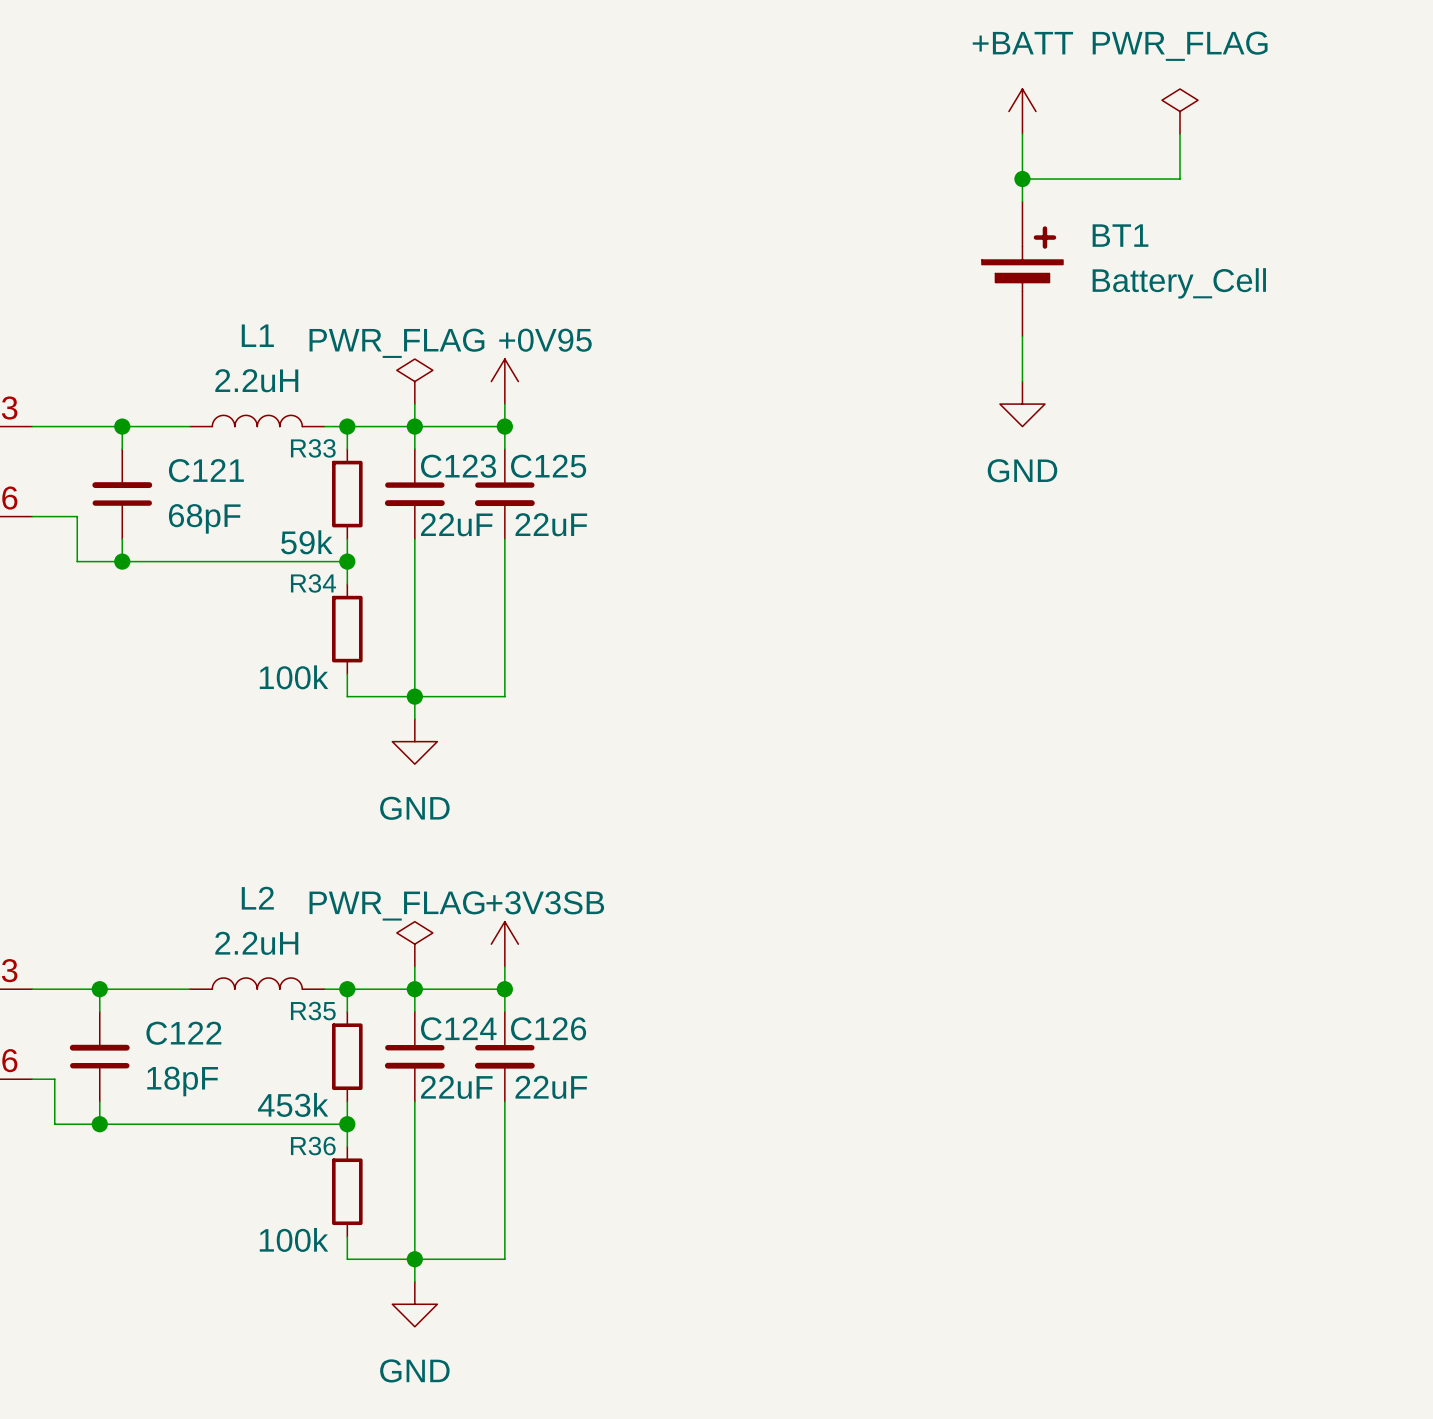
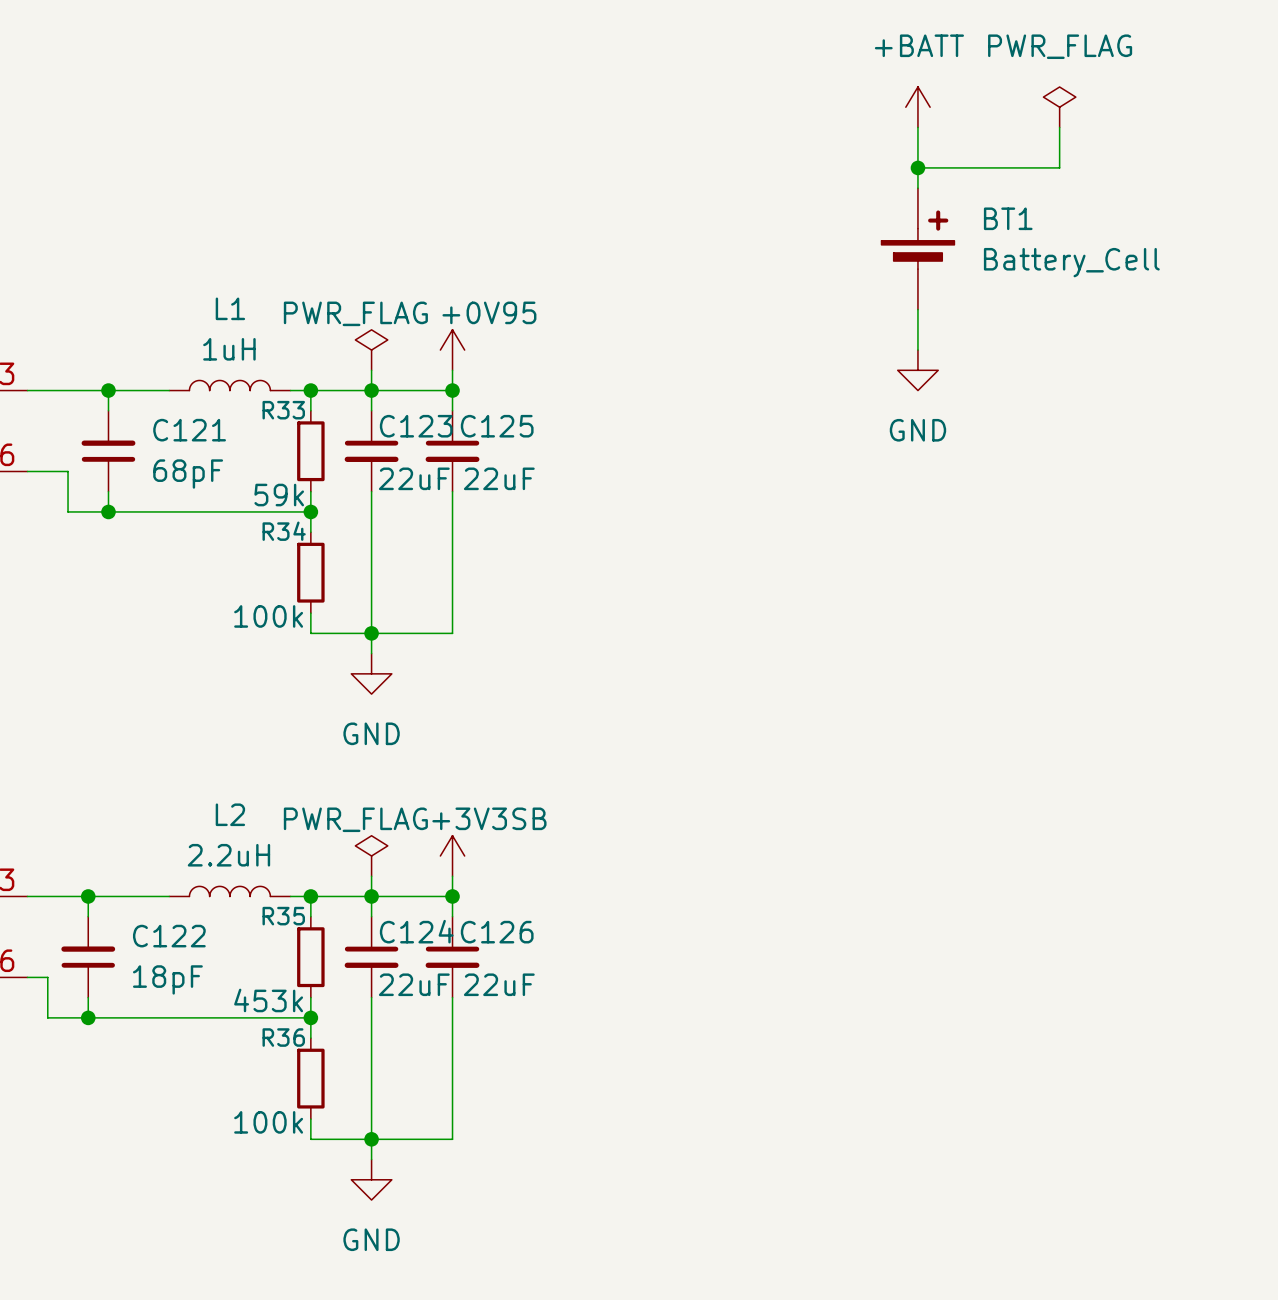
L1 value: 2.2uH (256, 380) -> 1uH (229, 349)

